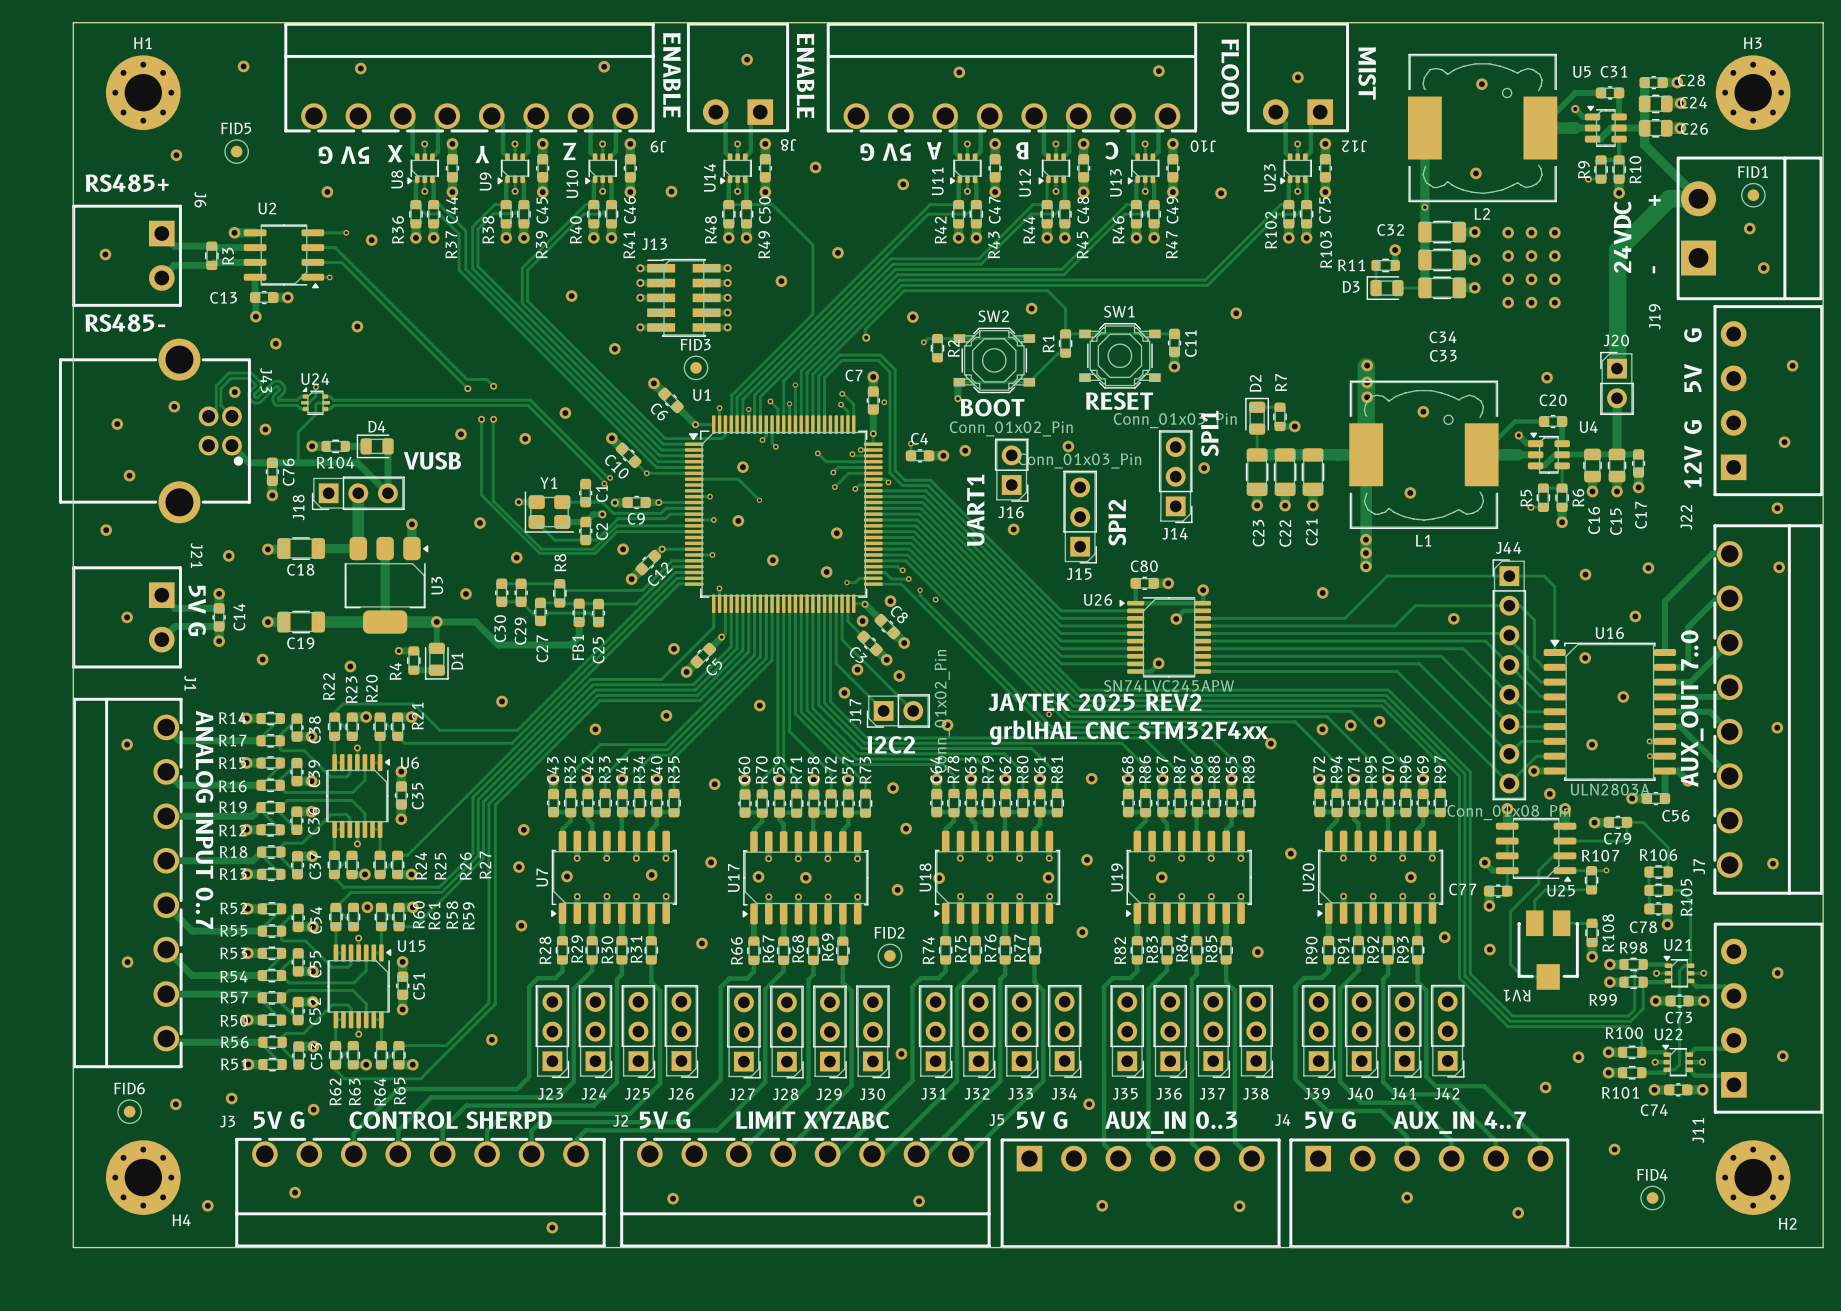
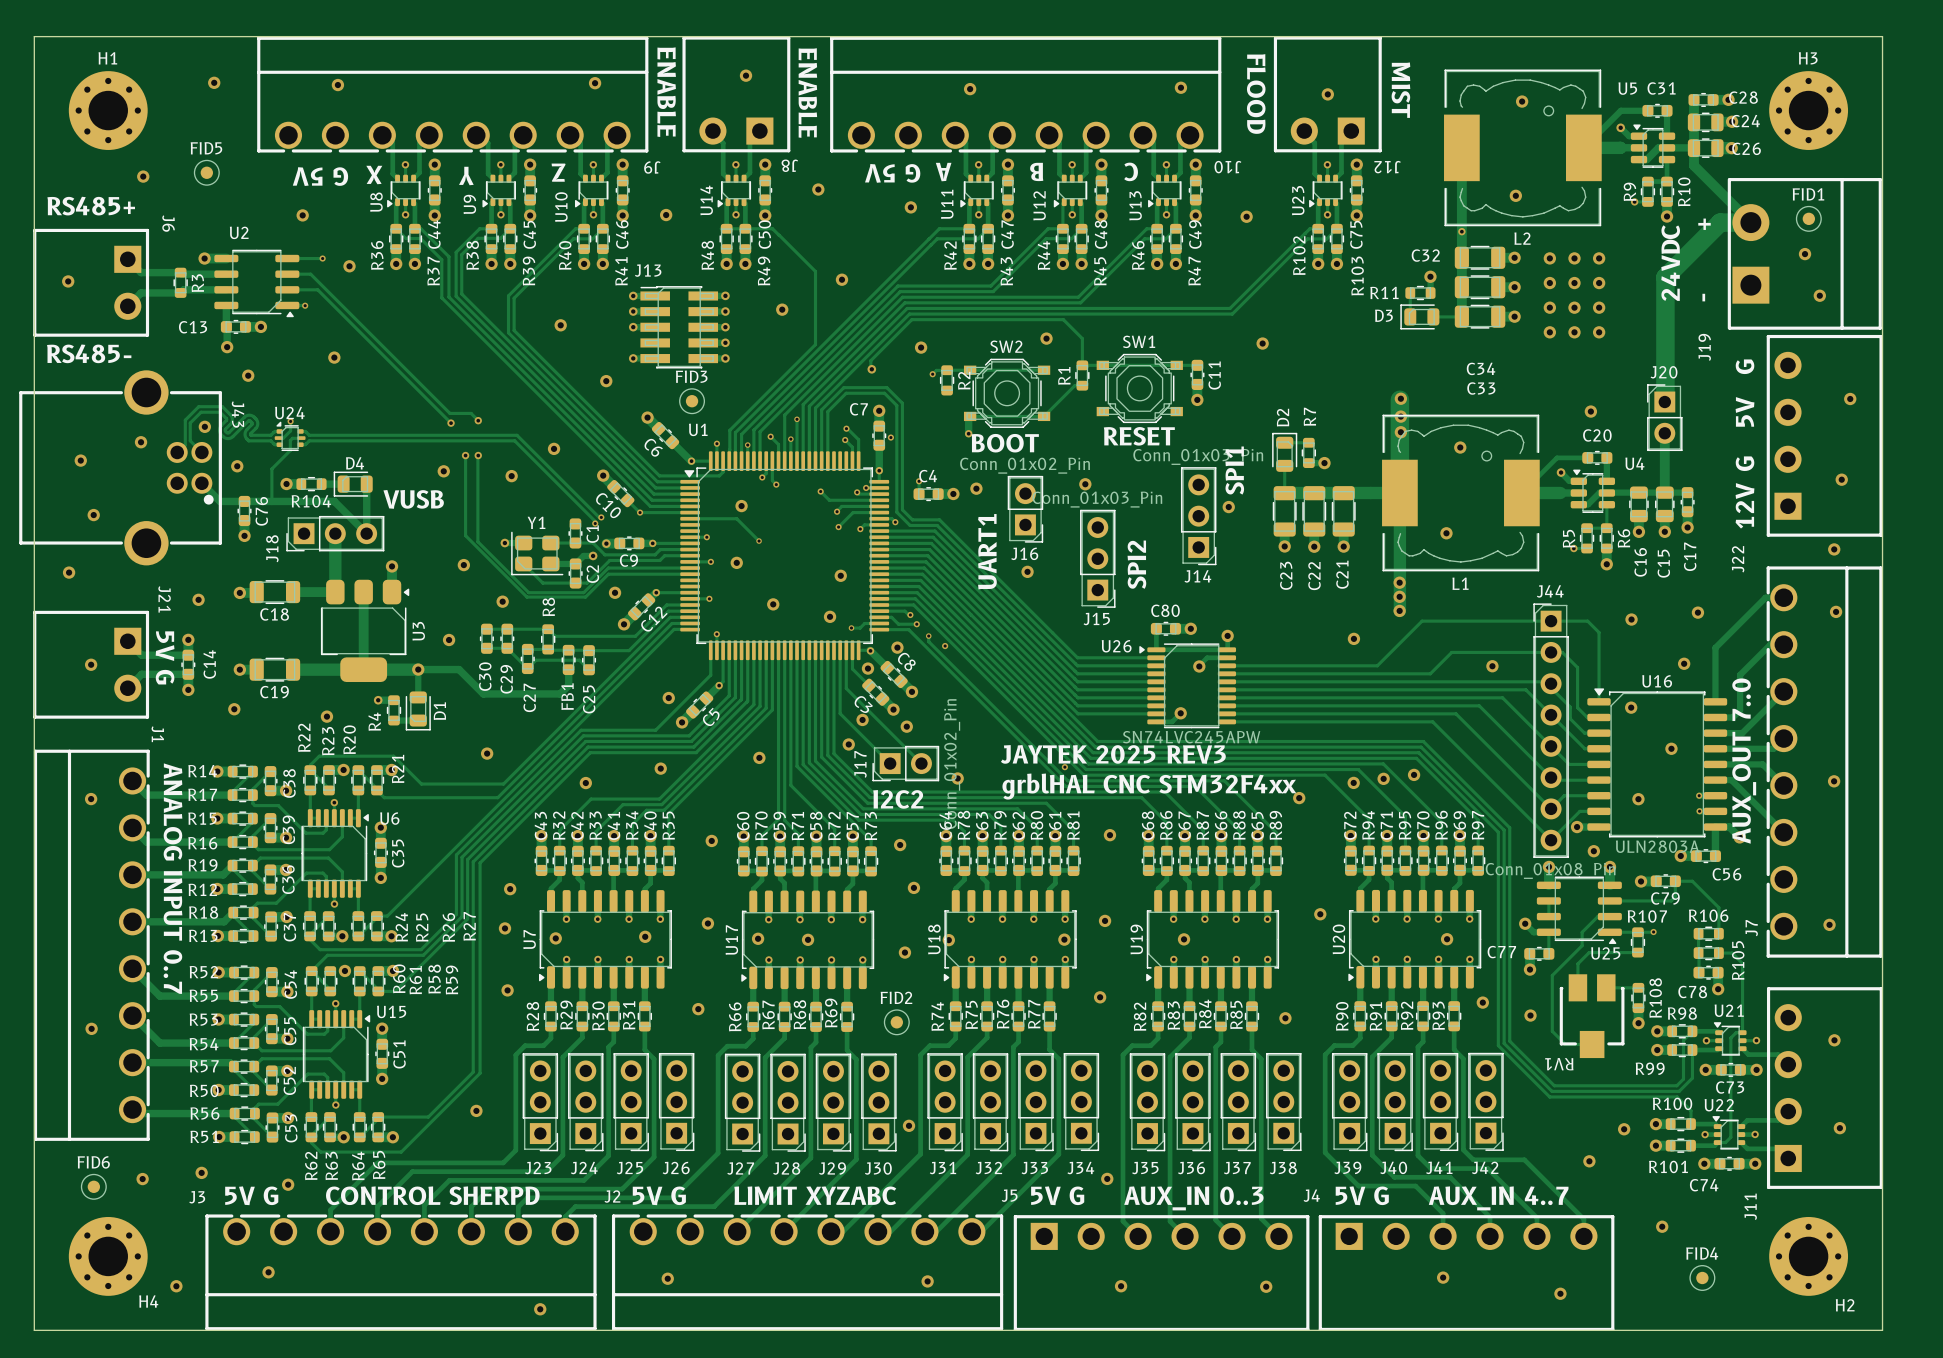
text: 5V G (885, 152) -> G 5V (892, 173)
text: 5V G (343, 155) -> G 5V (320, 176)
text: JAYTEK 2025 REV2 (1094, 702) -> JAYTEK 2025 REV3 (1113, 754)

